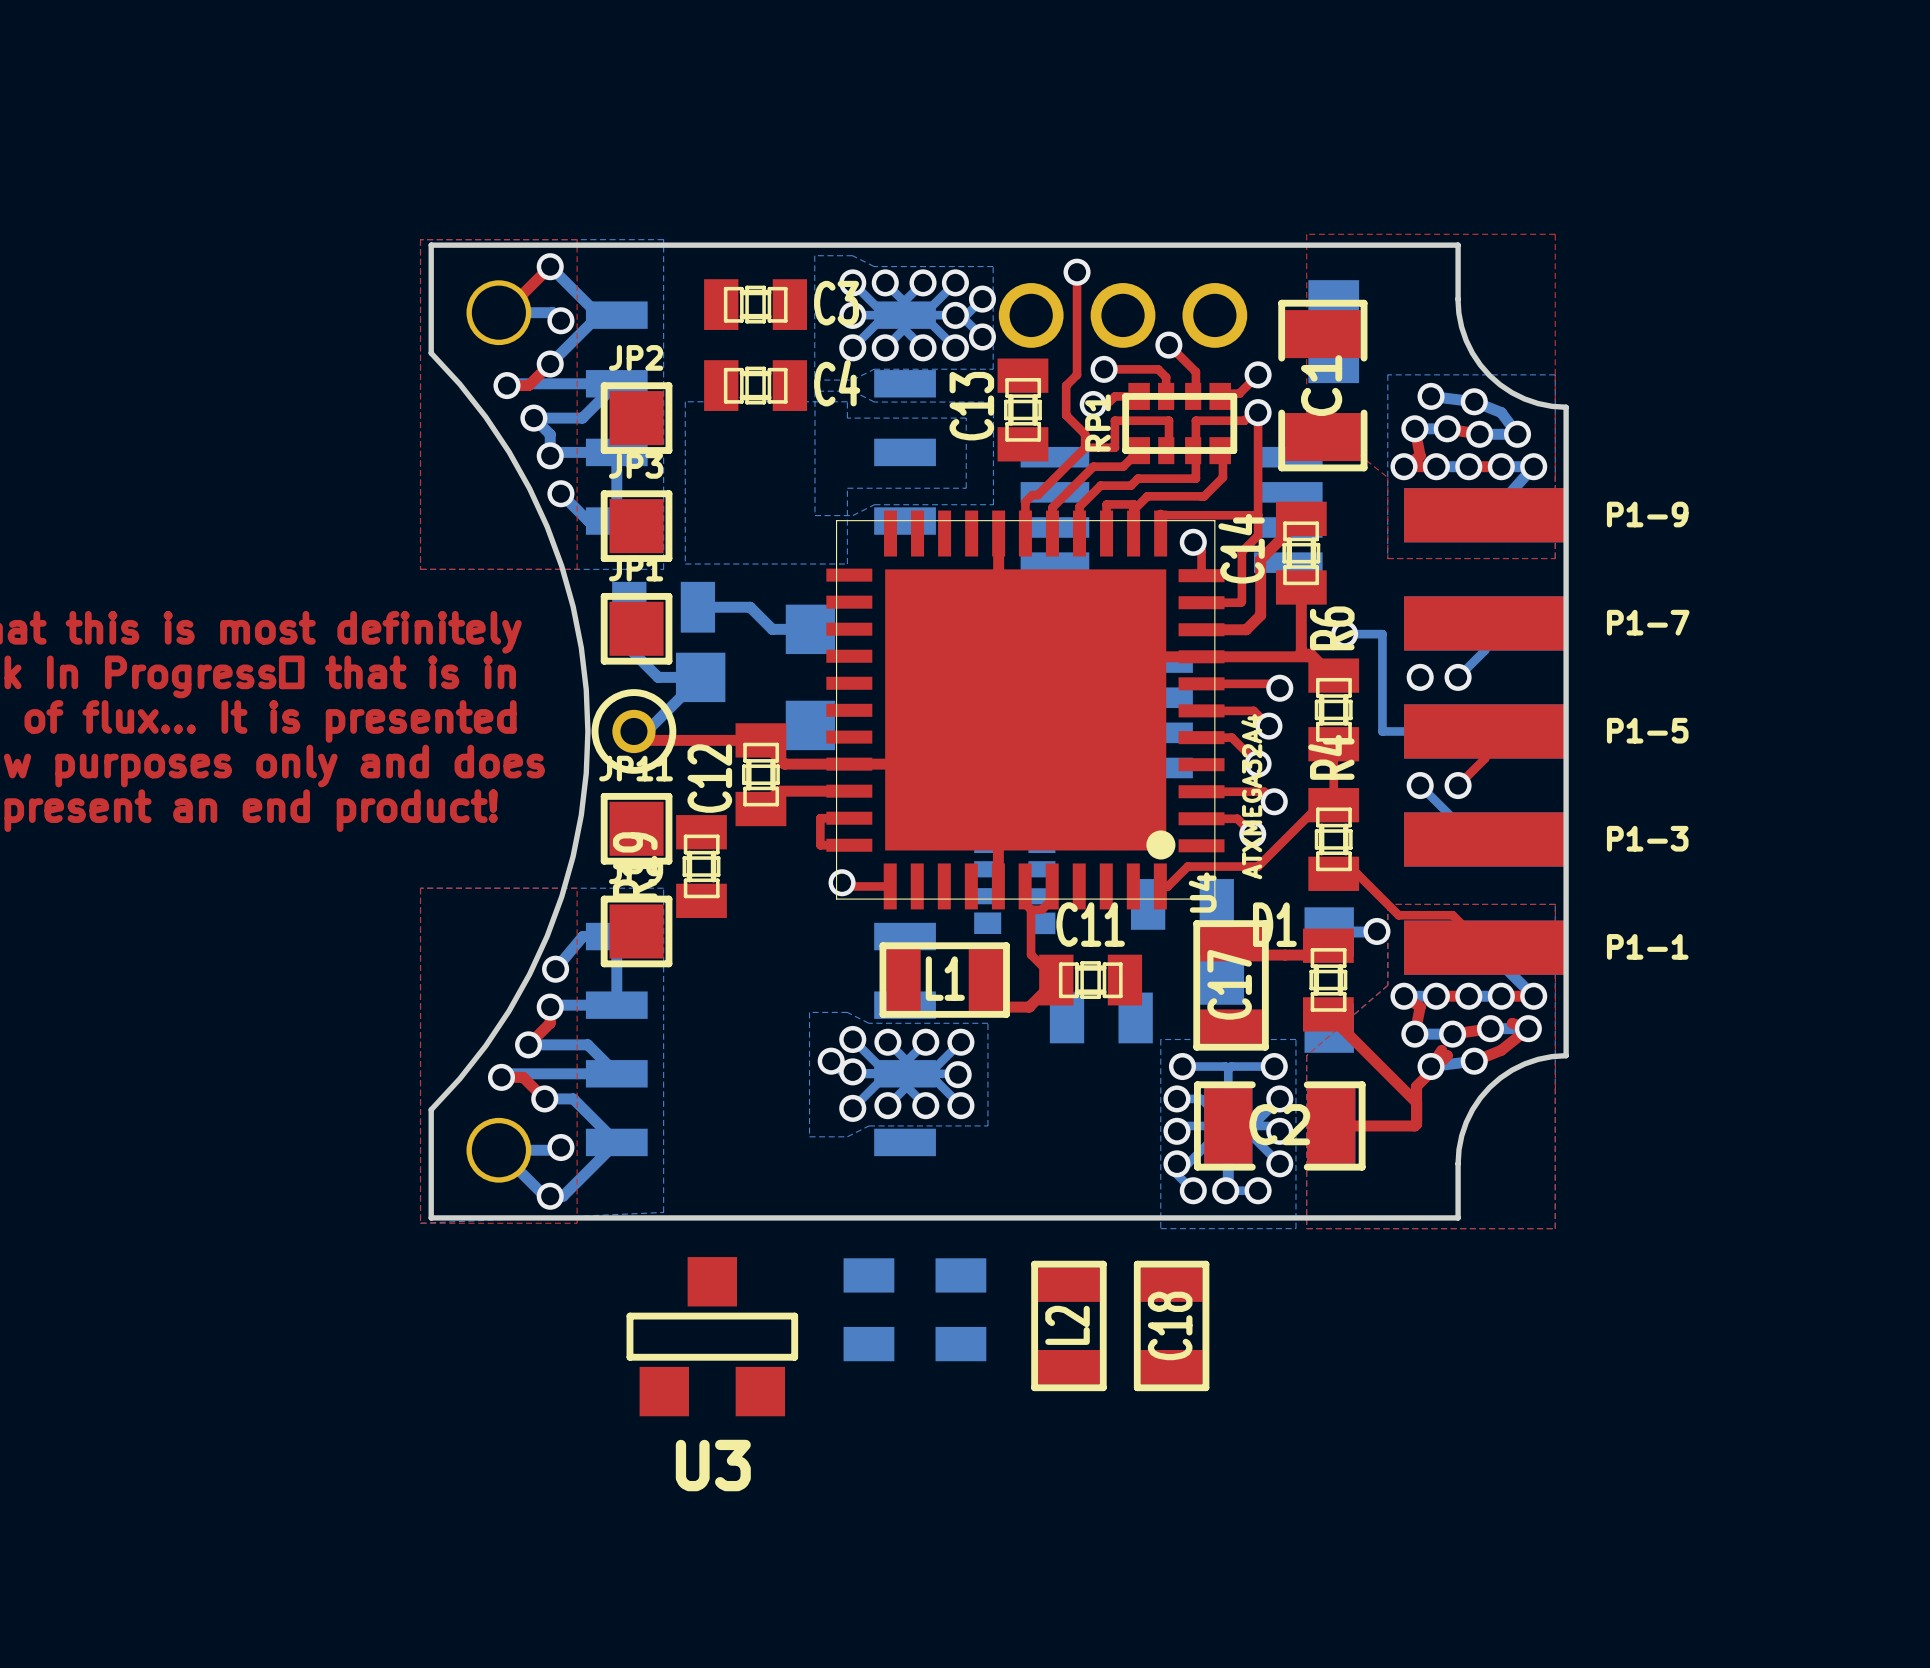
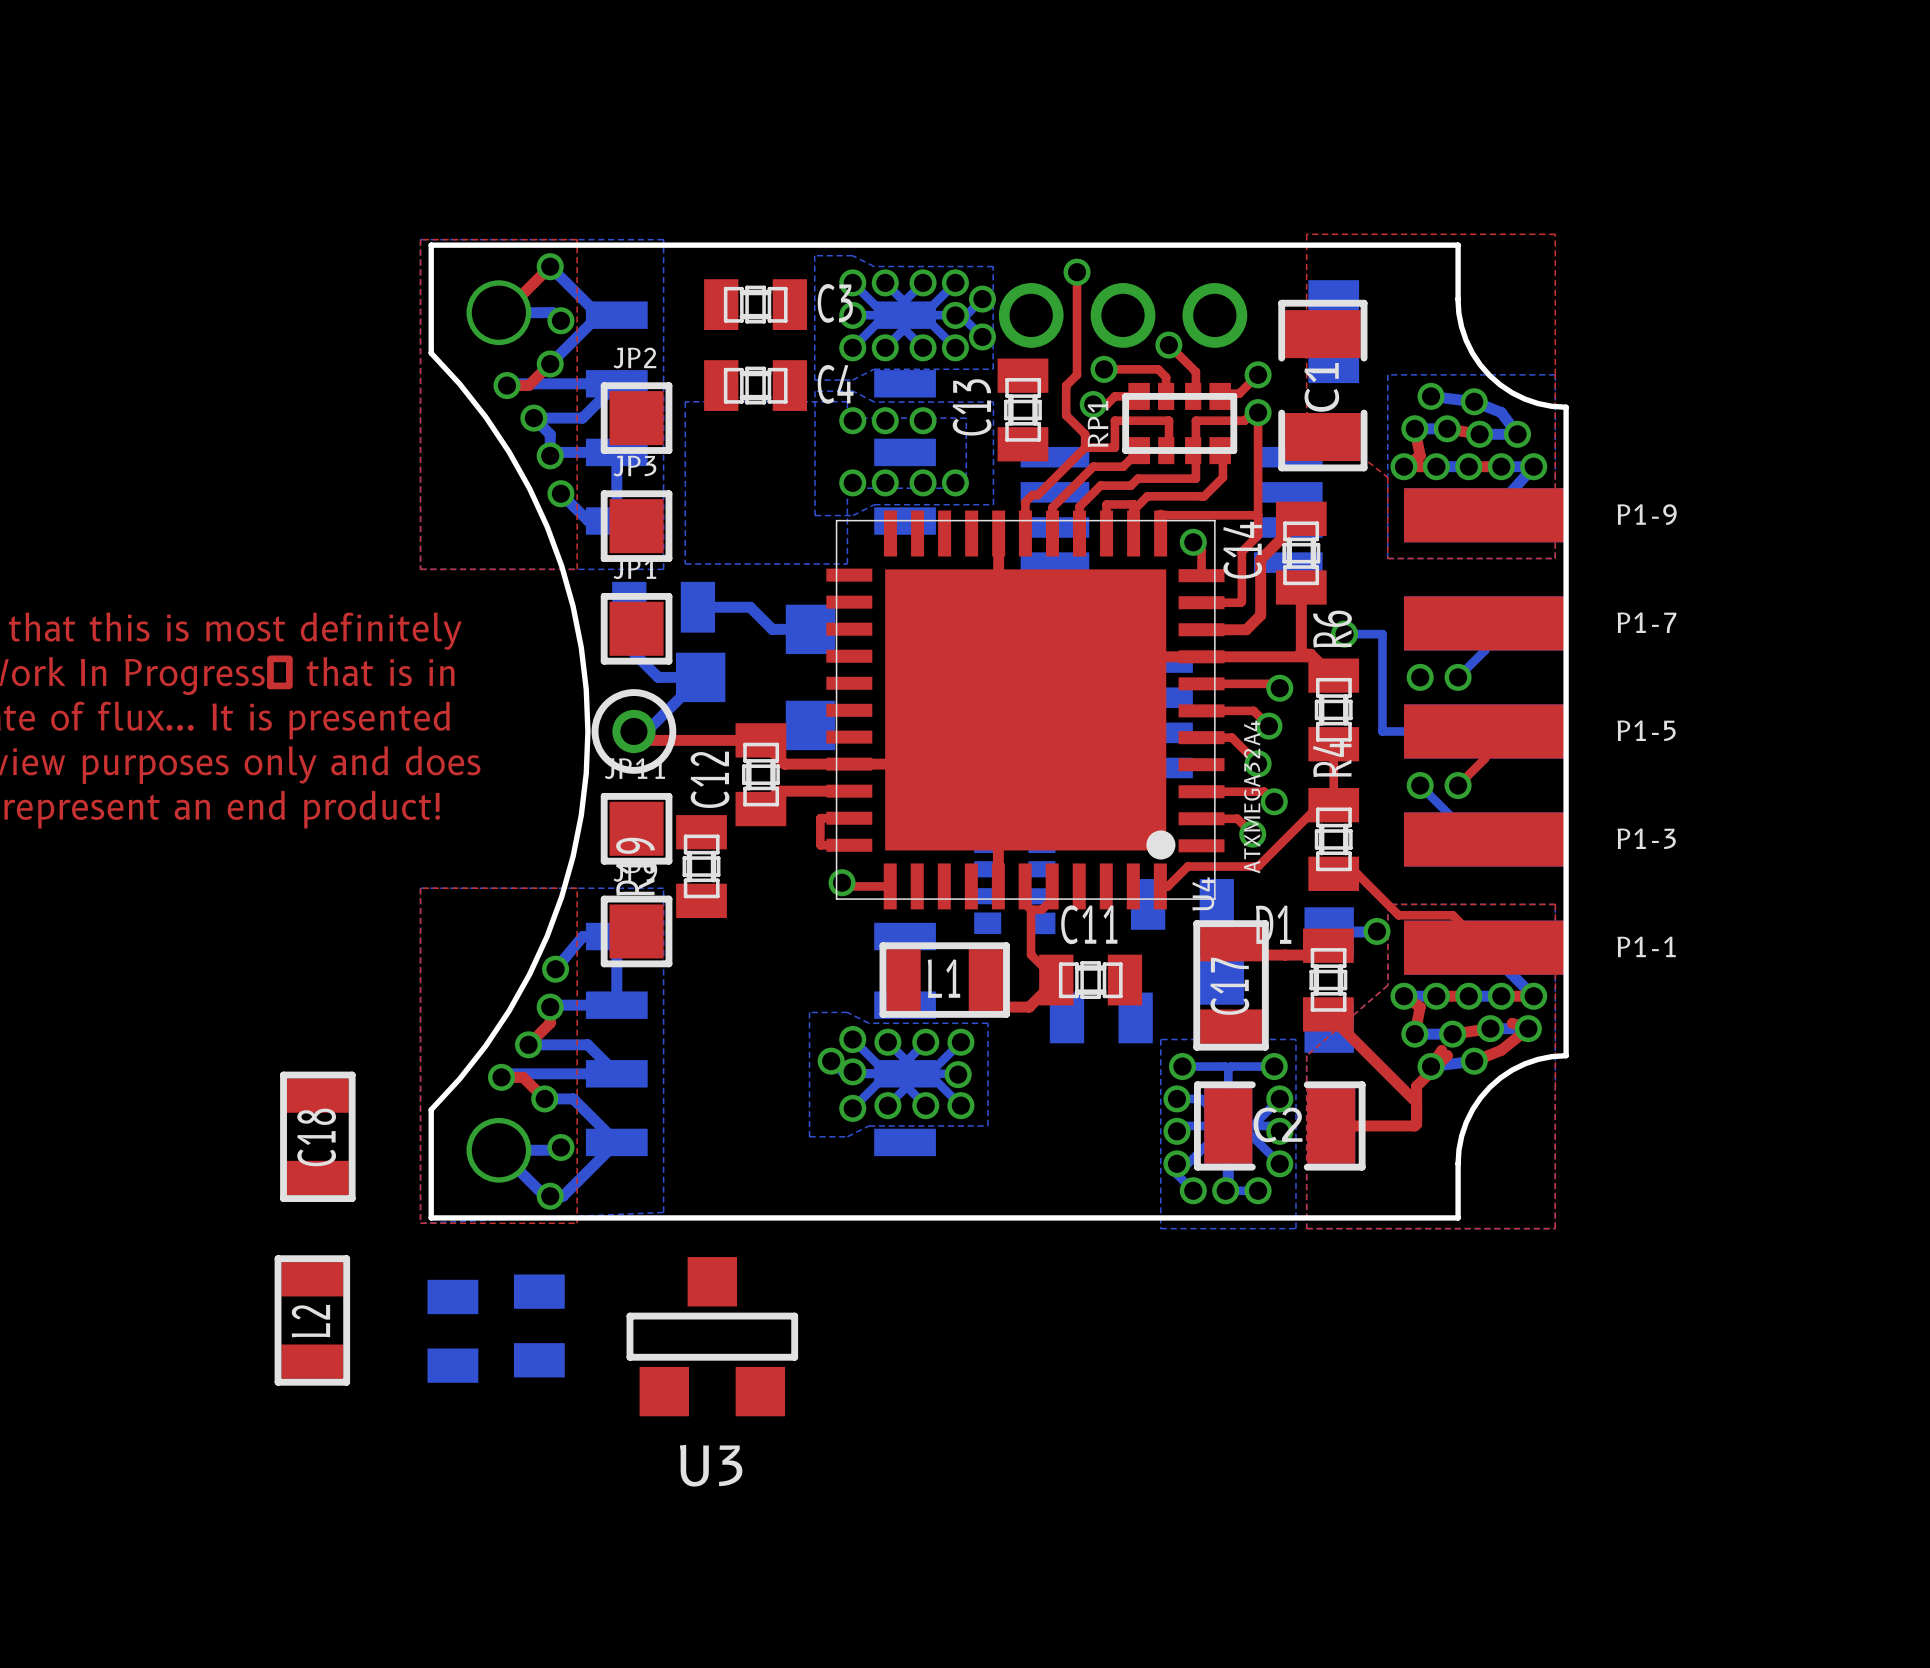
via: none -> (852, 420)
via: none -> (885, 420)
via: none -> (923, 420)
via: none -> (852, 482)
via: none -> (885, 482)
via: none -> (923, 482)
via: none -> (955, 482)
part: (868, 1309) -> none
part: (960, 1309) -> none
part: none -> (539, 1325)
L2 position: (1068, 1325) -> (312, 1320)
C18 position: (1171, 1325) -> (317, 1136)
part: none -> (452, 1331)

